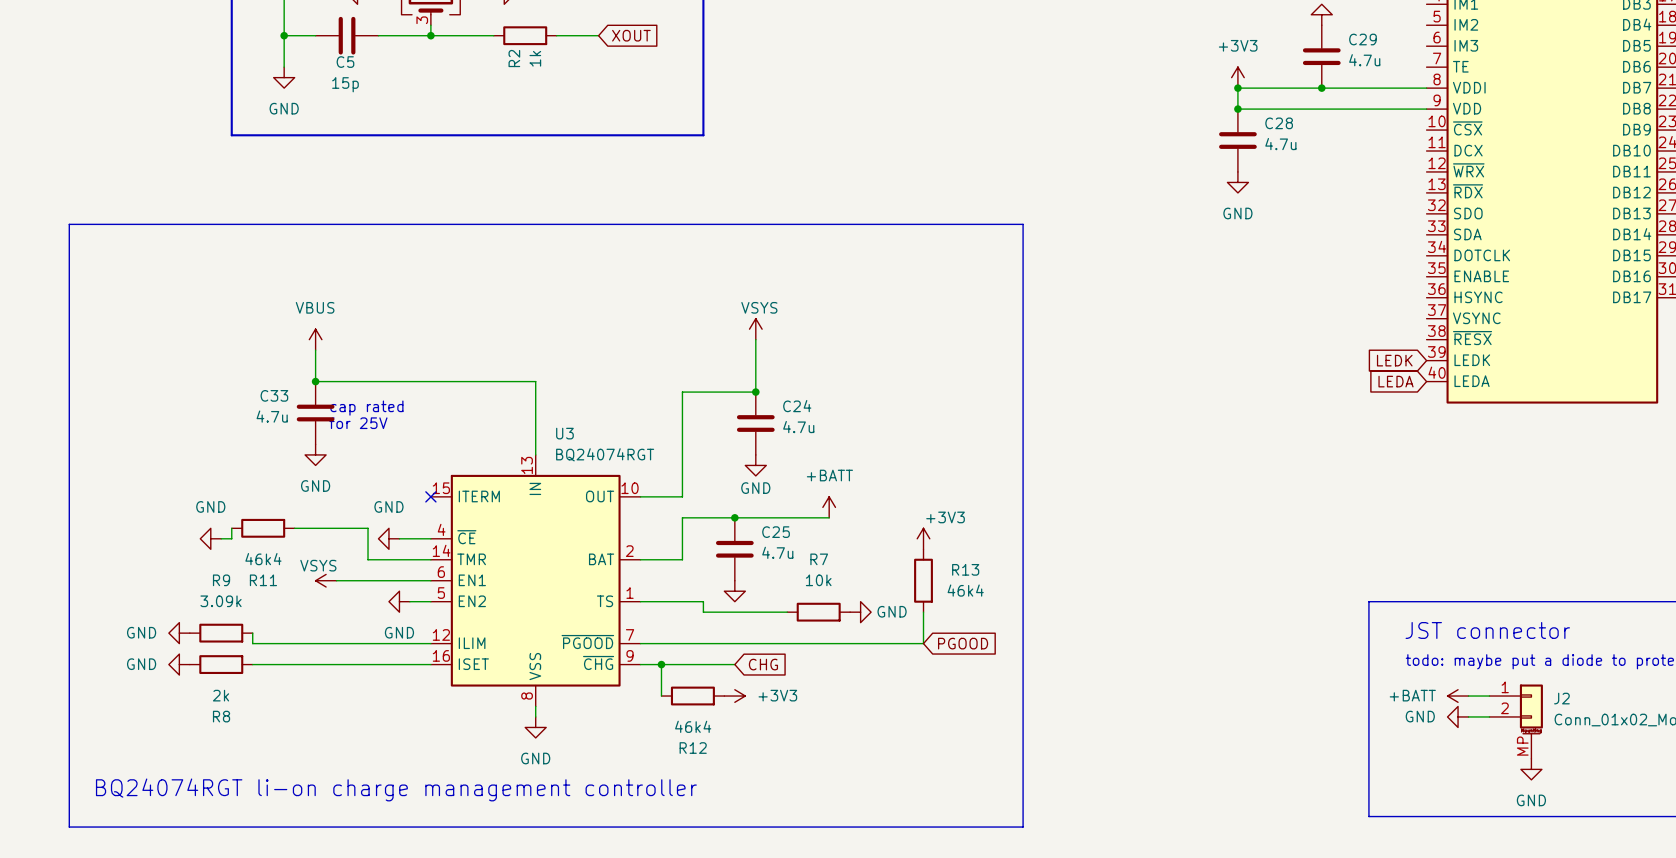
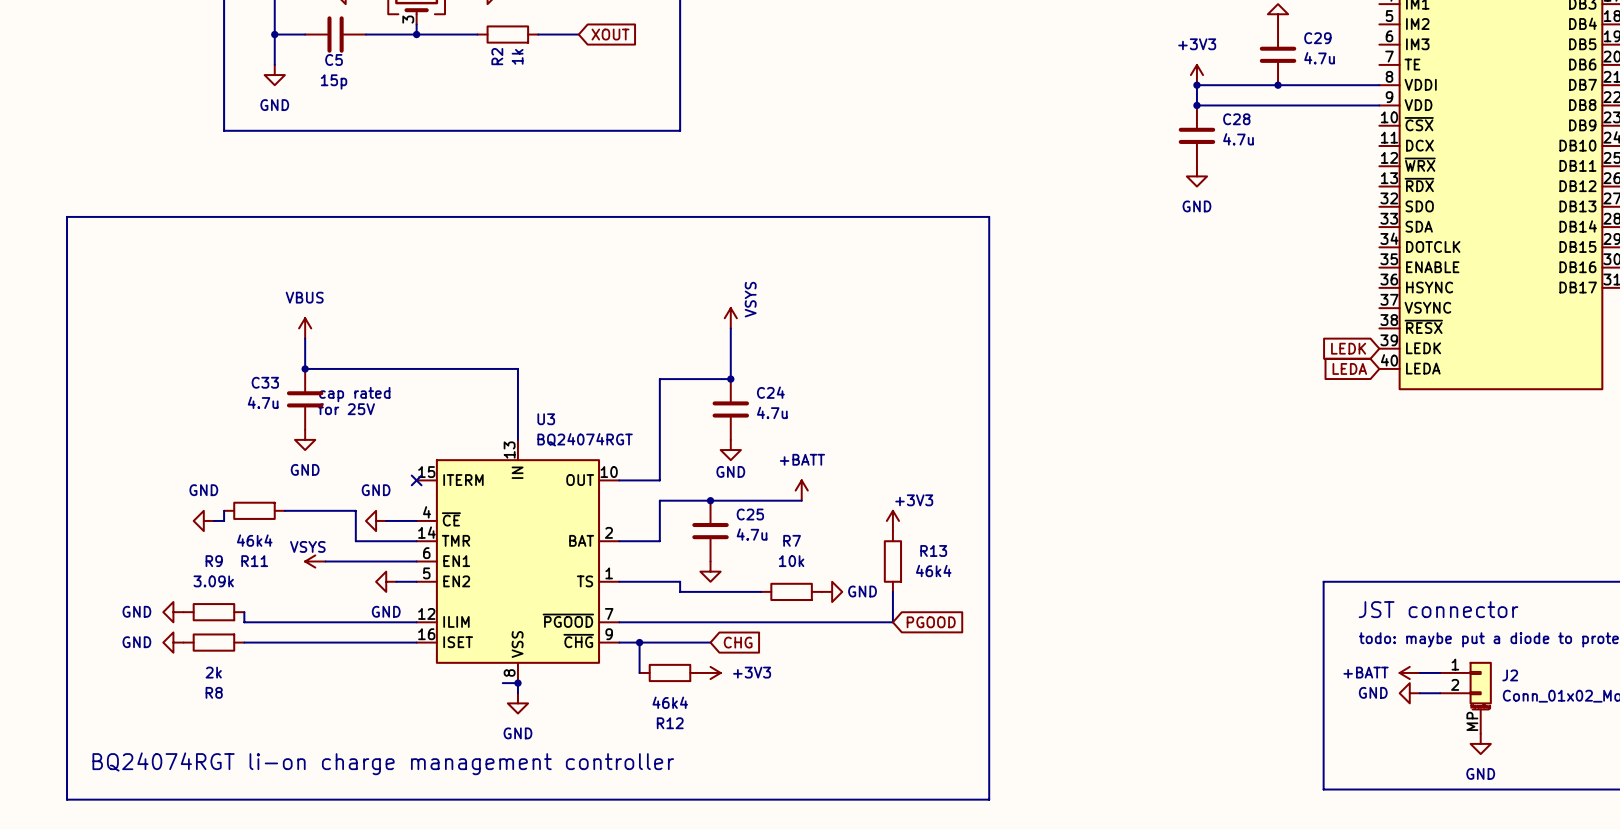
power symbol text rotation: 0° (759, 307) -> 90° counterclockwise (750, 299)
wire: none -> (502, 683) (517, 683)
junction: none -> (517, 683)

